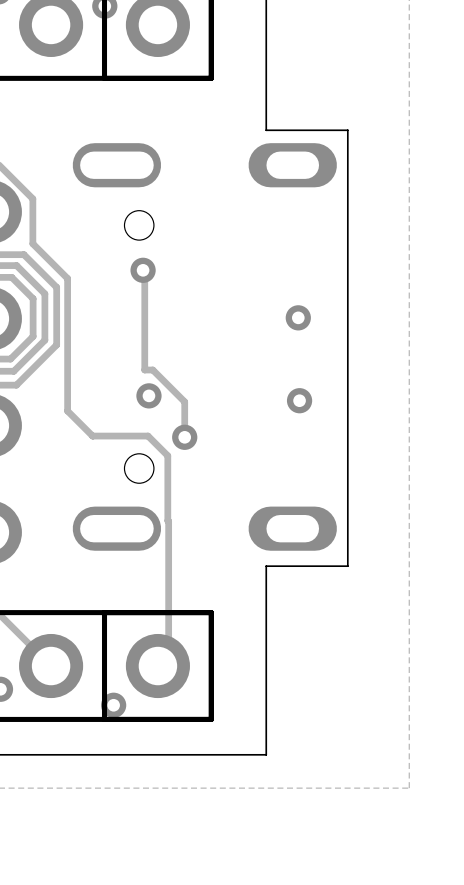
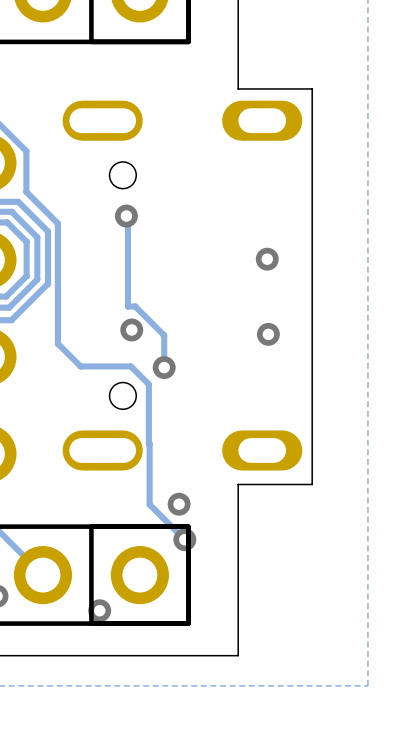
via: none -> (179, 504)
track: (168, 588) (168, 655) (157, 666) -> (149, 504) (184, 539)
via: none -> (184, 539)

